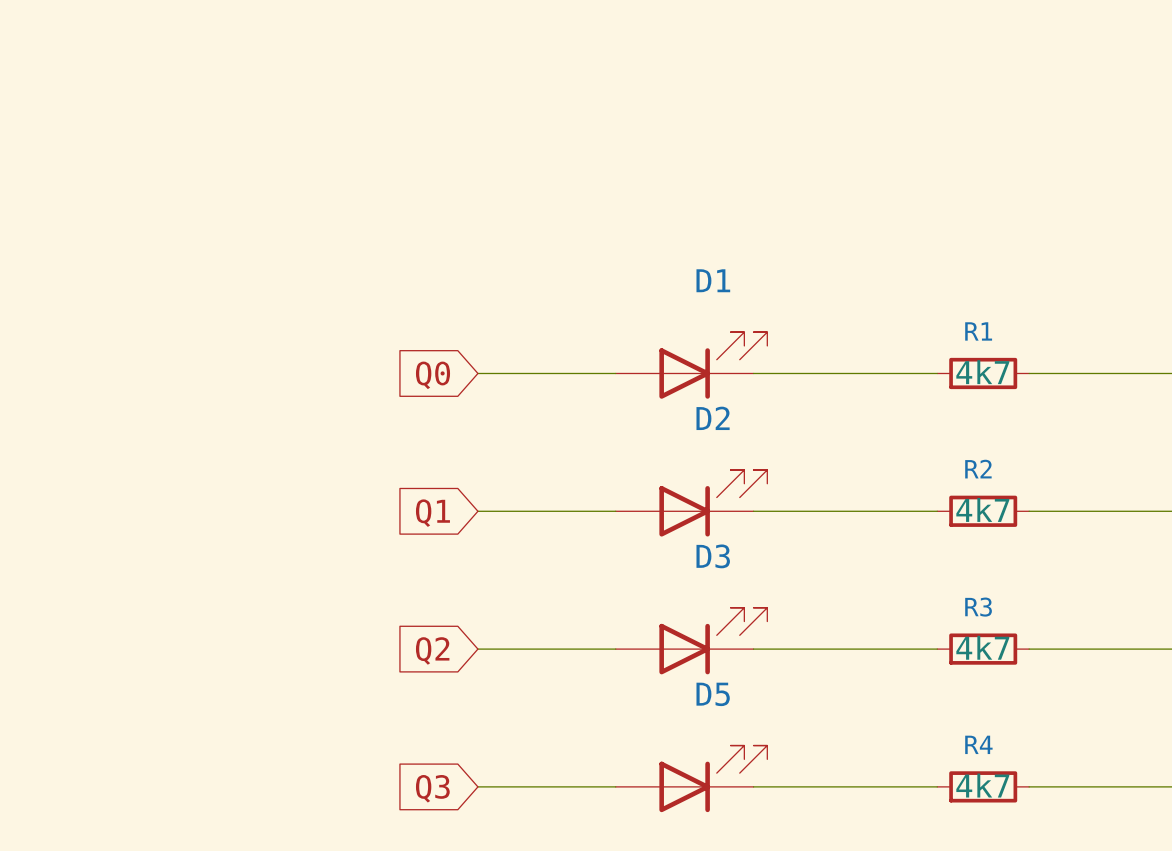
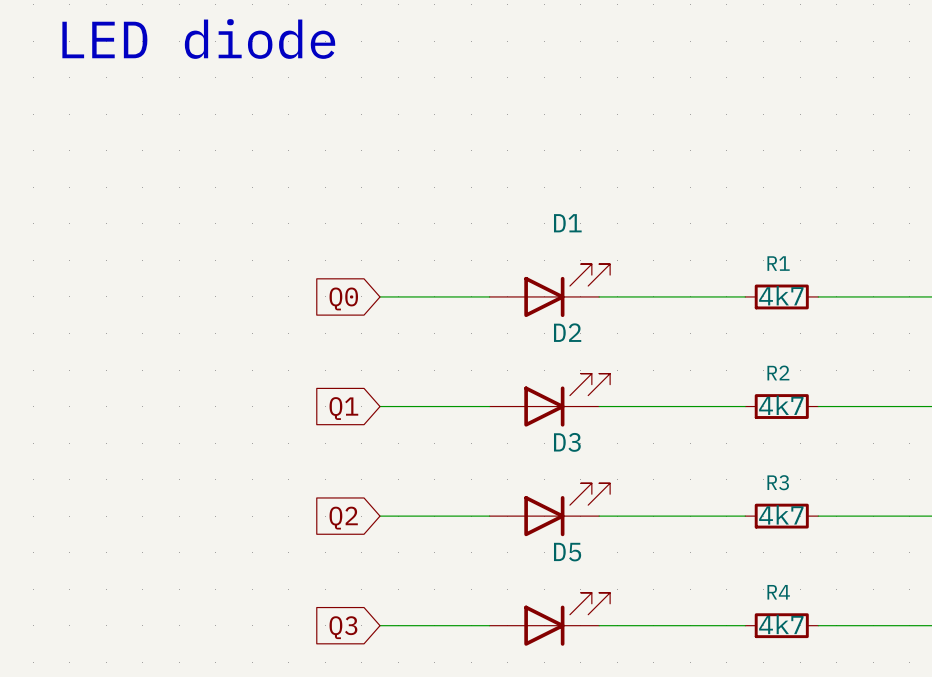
text: none -> LED diode (198, 39)

